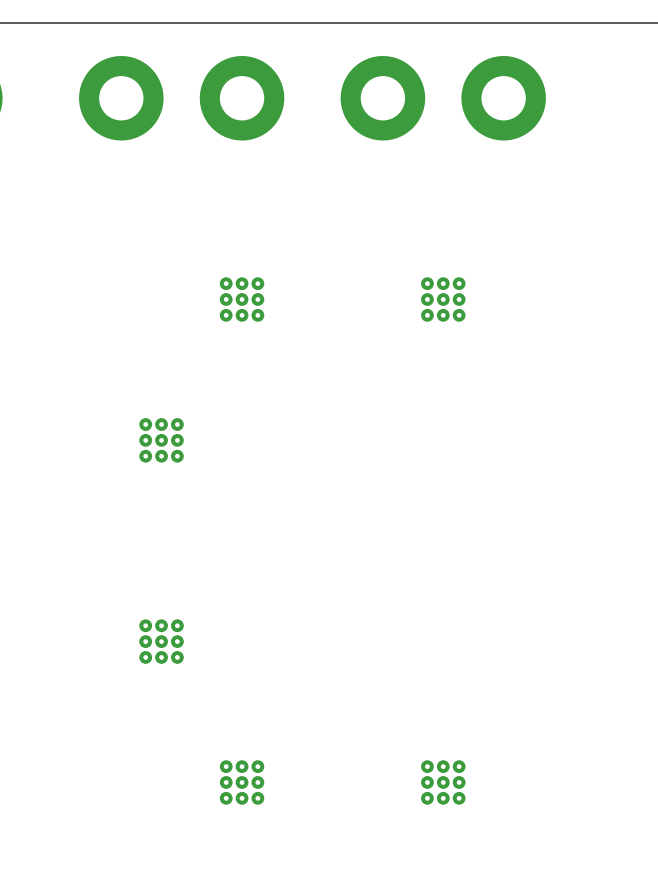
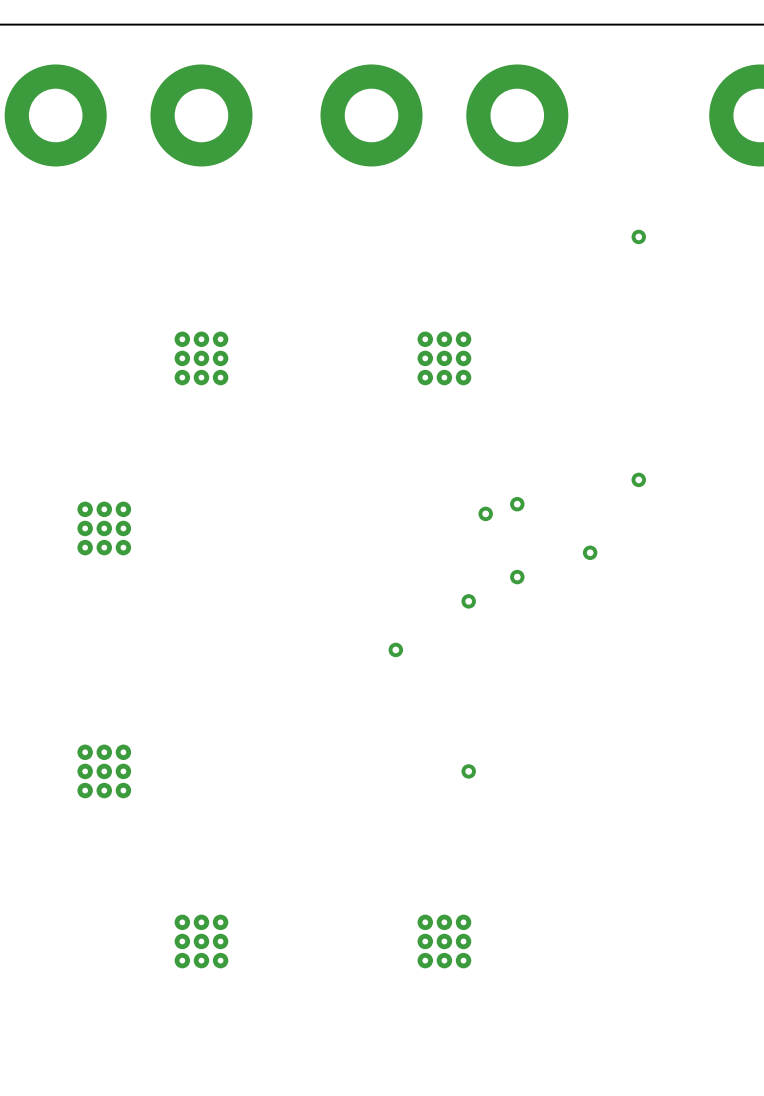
via: none -> (638, 236)
via: none -> (638, 479)
via: none -> (517, 504)
via: none -> (485, 513)
via: none -> (590, 552)
via: none -> (517, 577)
via: none -> (468, 601)
via: none -> (395, 649)
via: none -> (468, 771)

